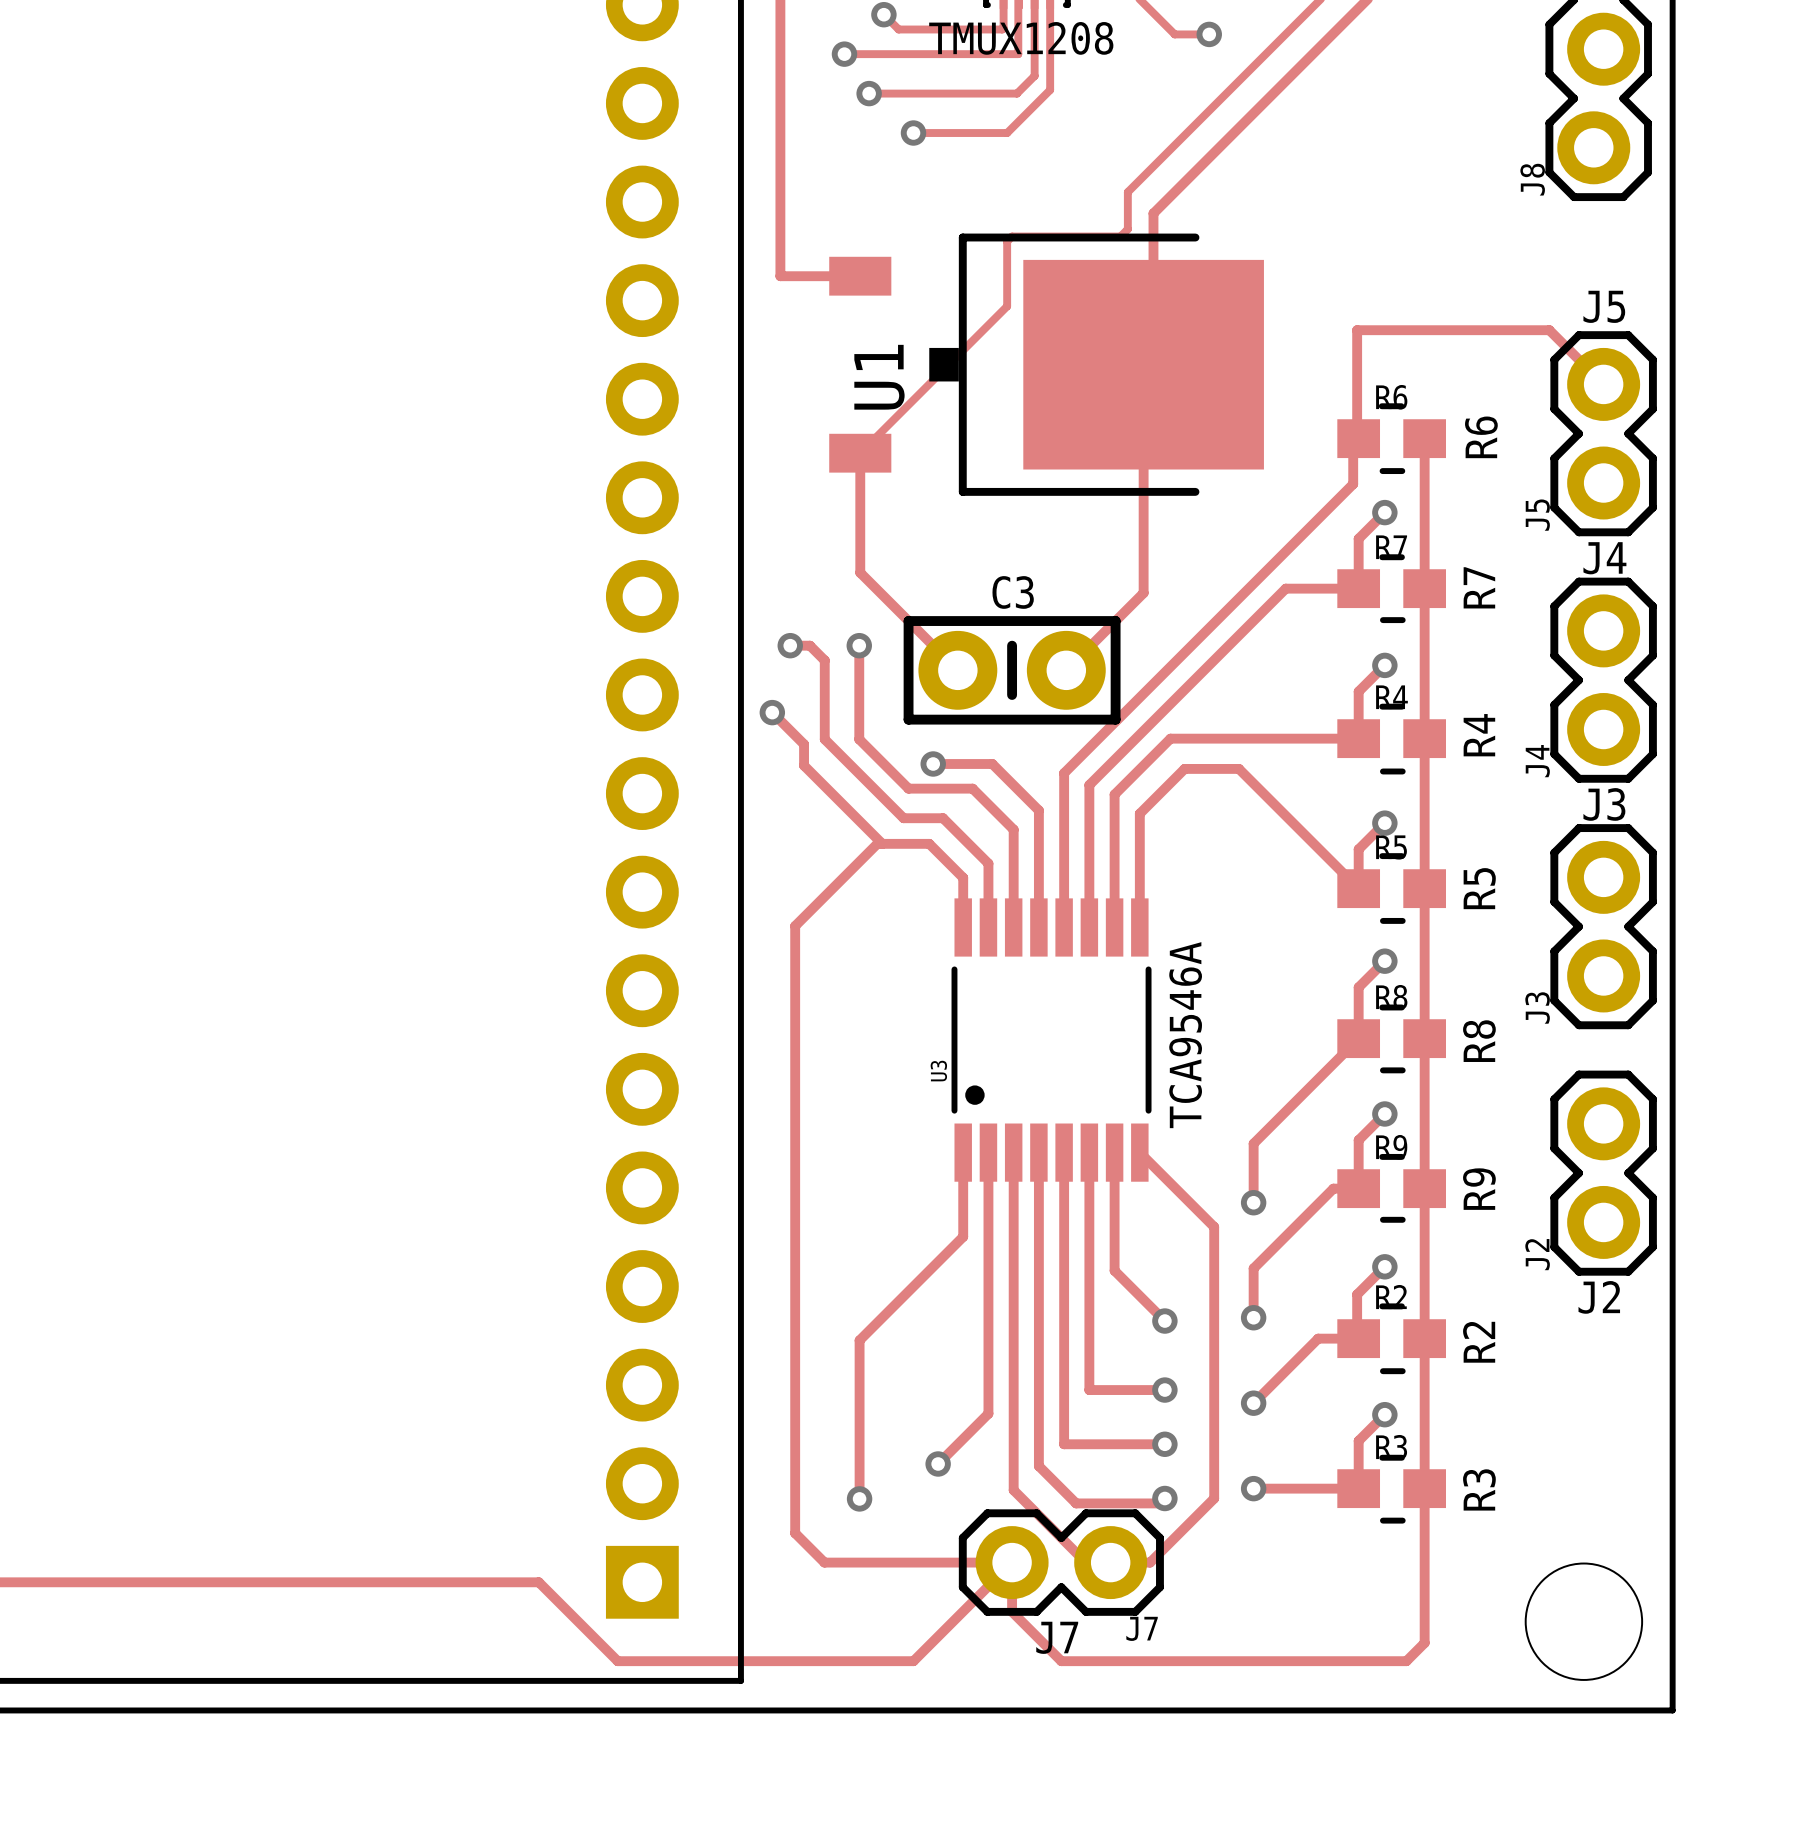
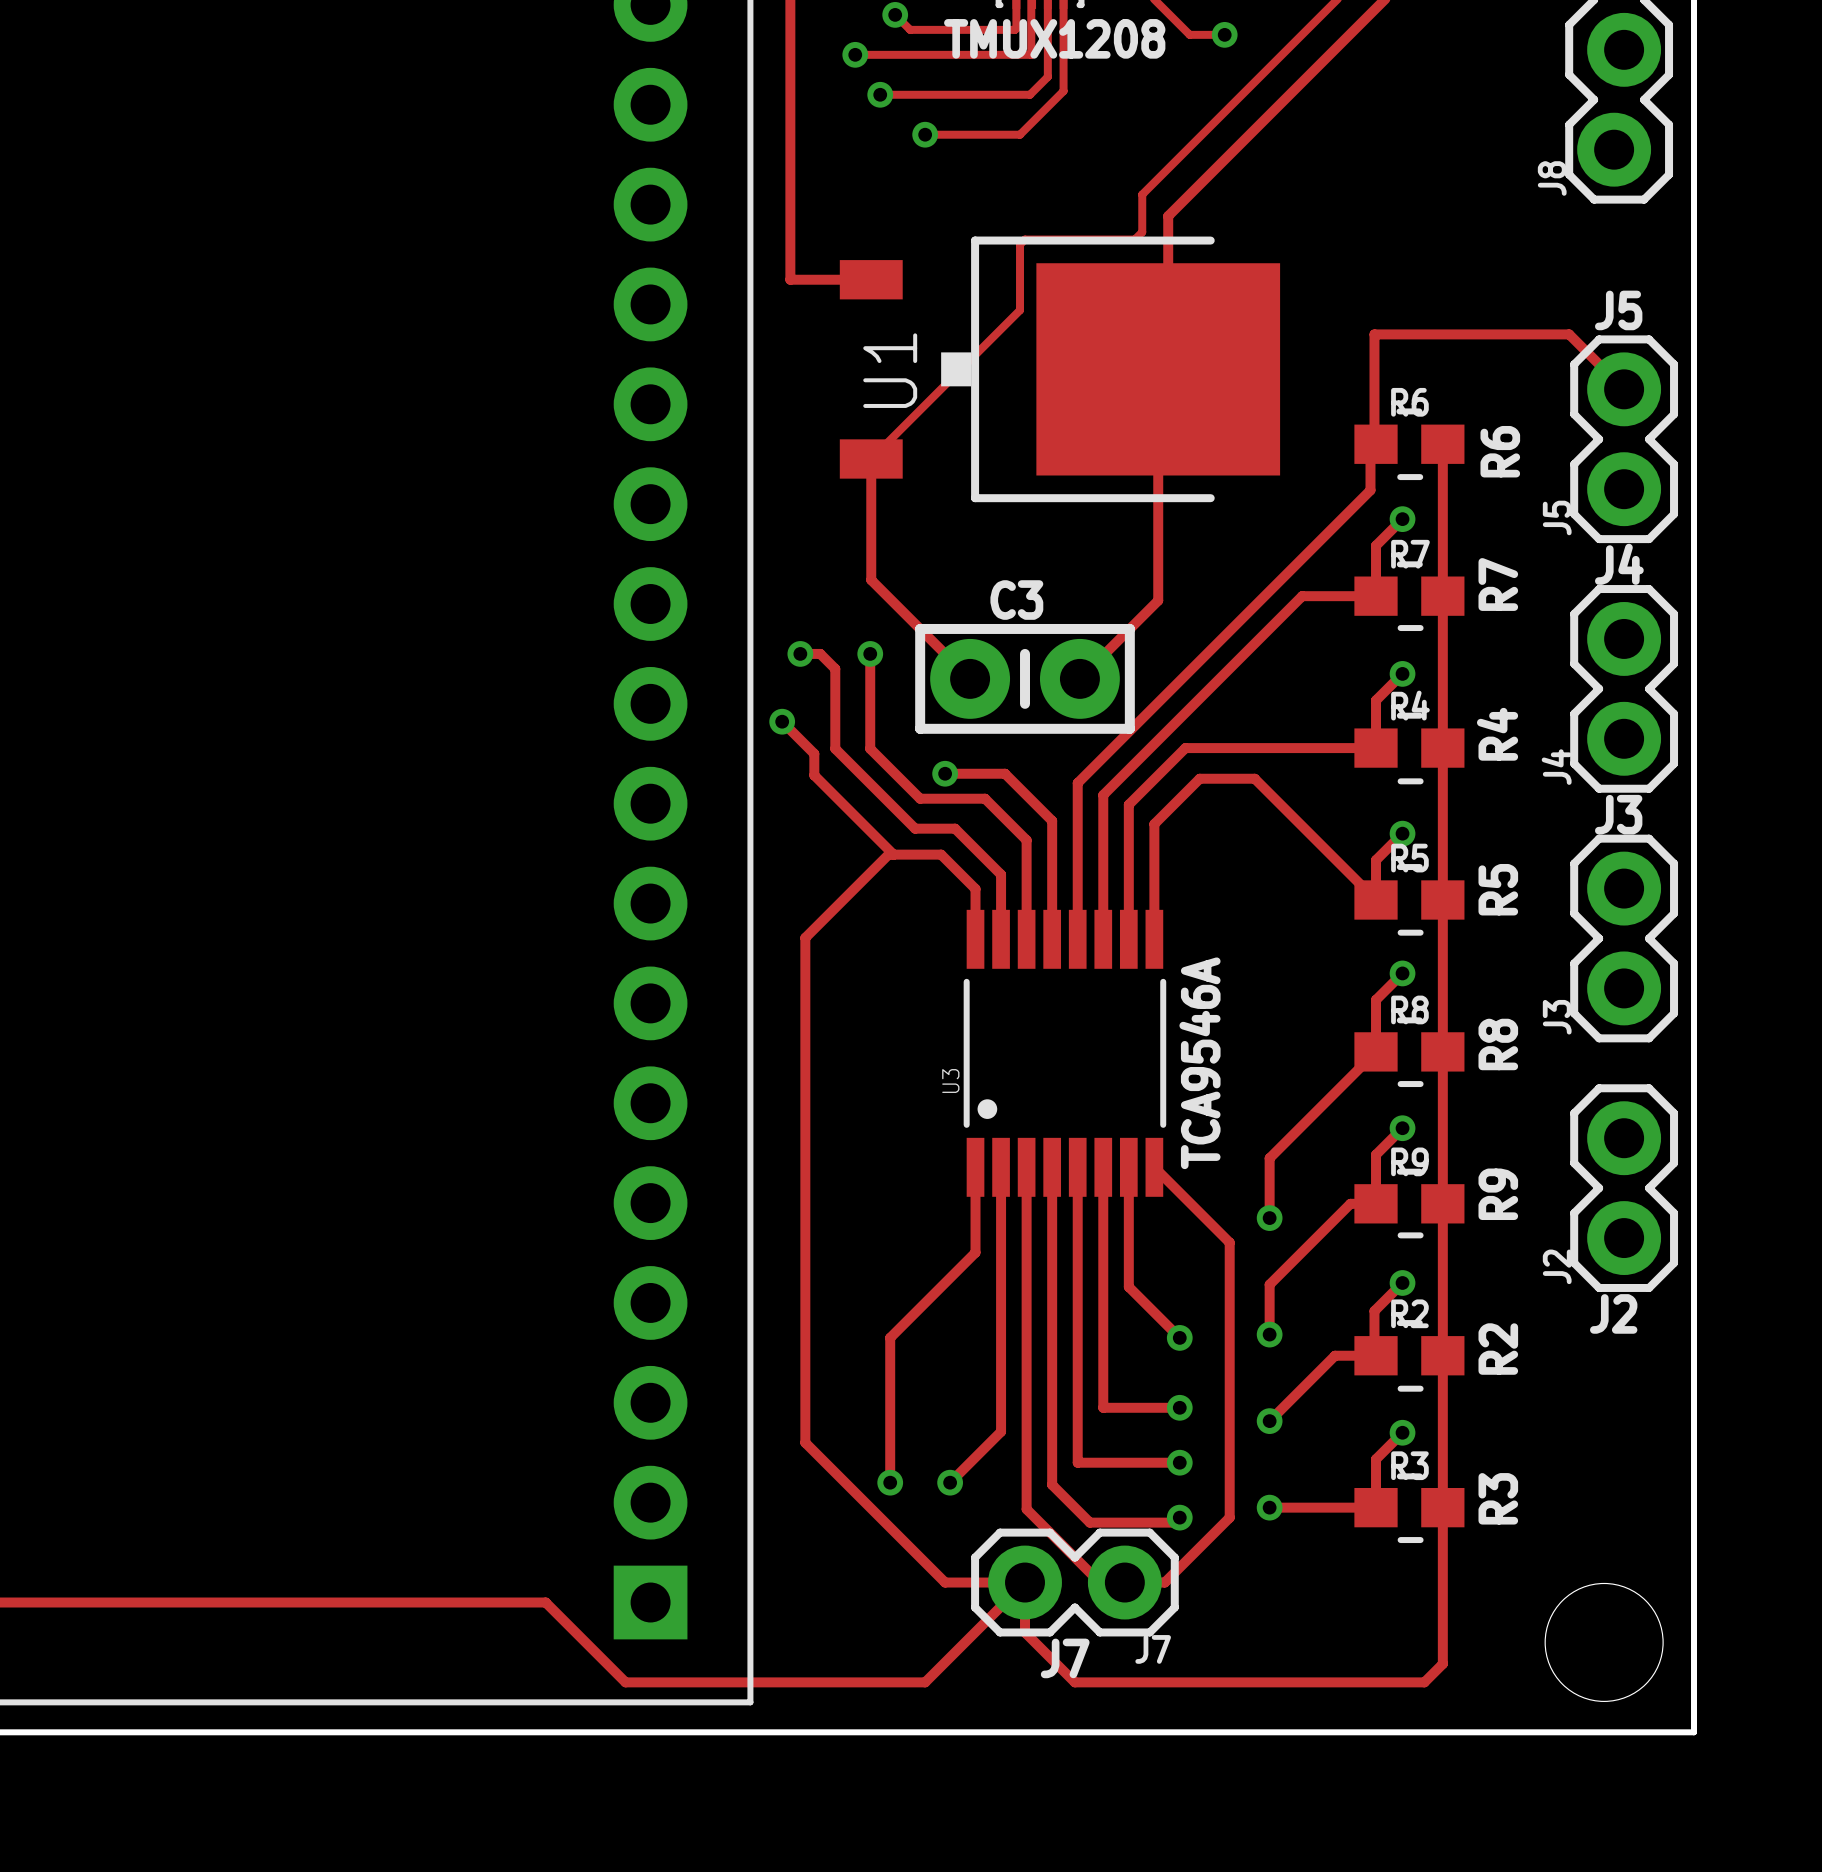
track: (878, 1321) (859, 1340) (859, 1498) -> (890, 1337) (890, 1482)
track: (795, 1424) (795, 1533) (824, 1562) (933, 1562) -> (805, 1442) (945, 1582)
via position: (859, 1498) -> (890, 1482)

